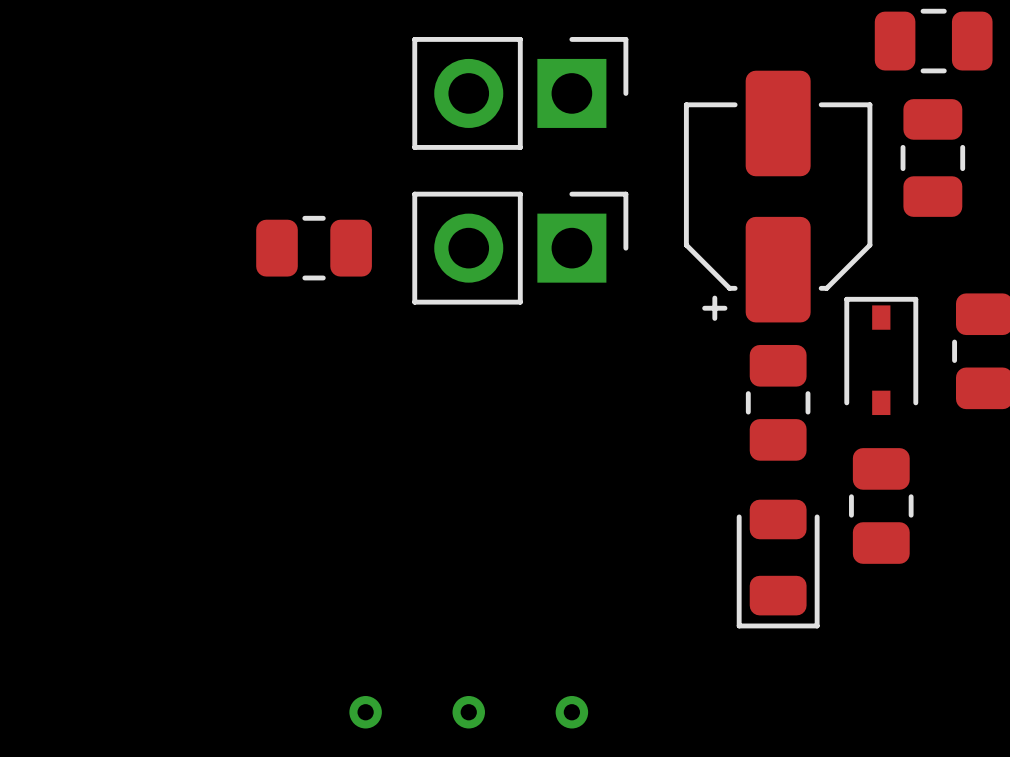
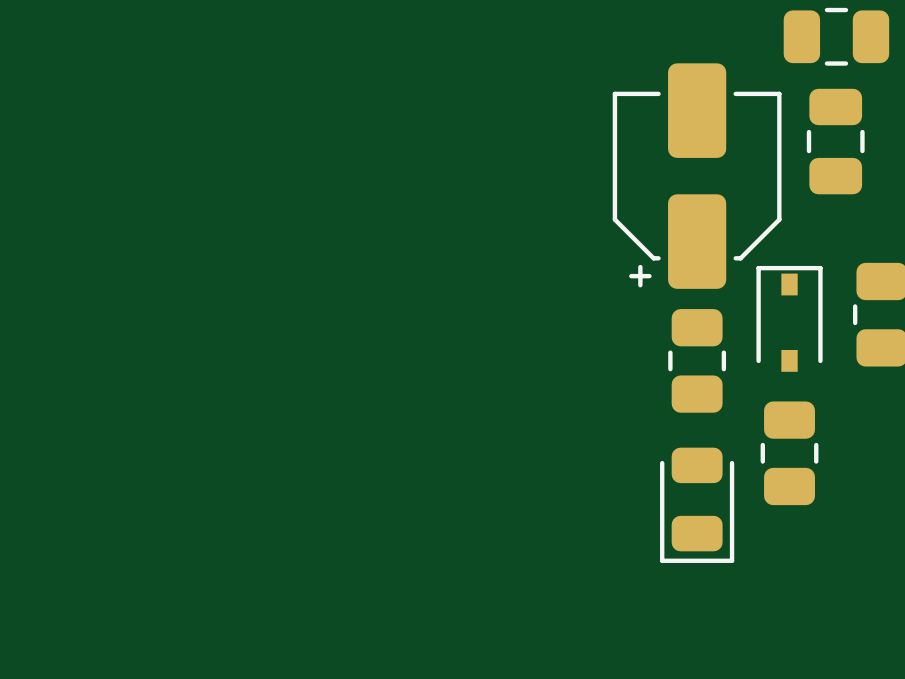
part: (520, 93) -> none
part: (314, 248) -> none
part: (520, 248) -> none
via: (365, 712) -> none
via: (468, 712) -> none
via: (571, 712) -> none

